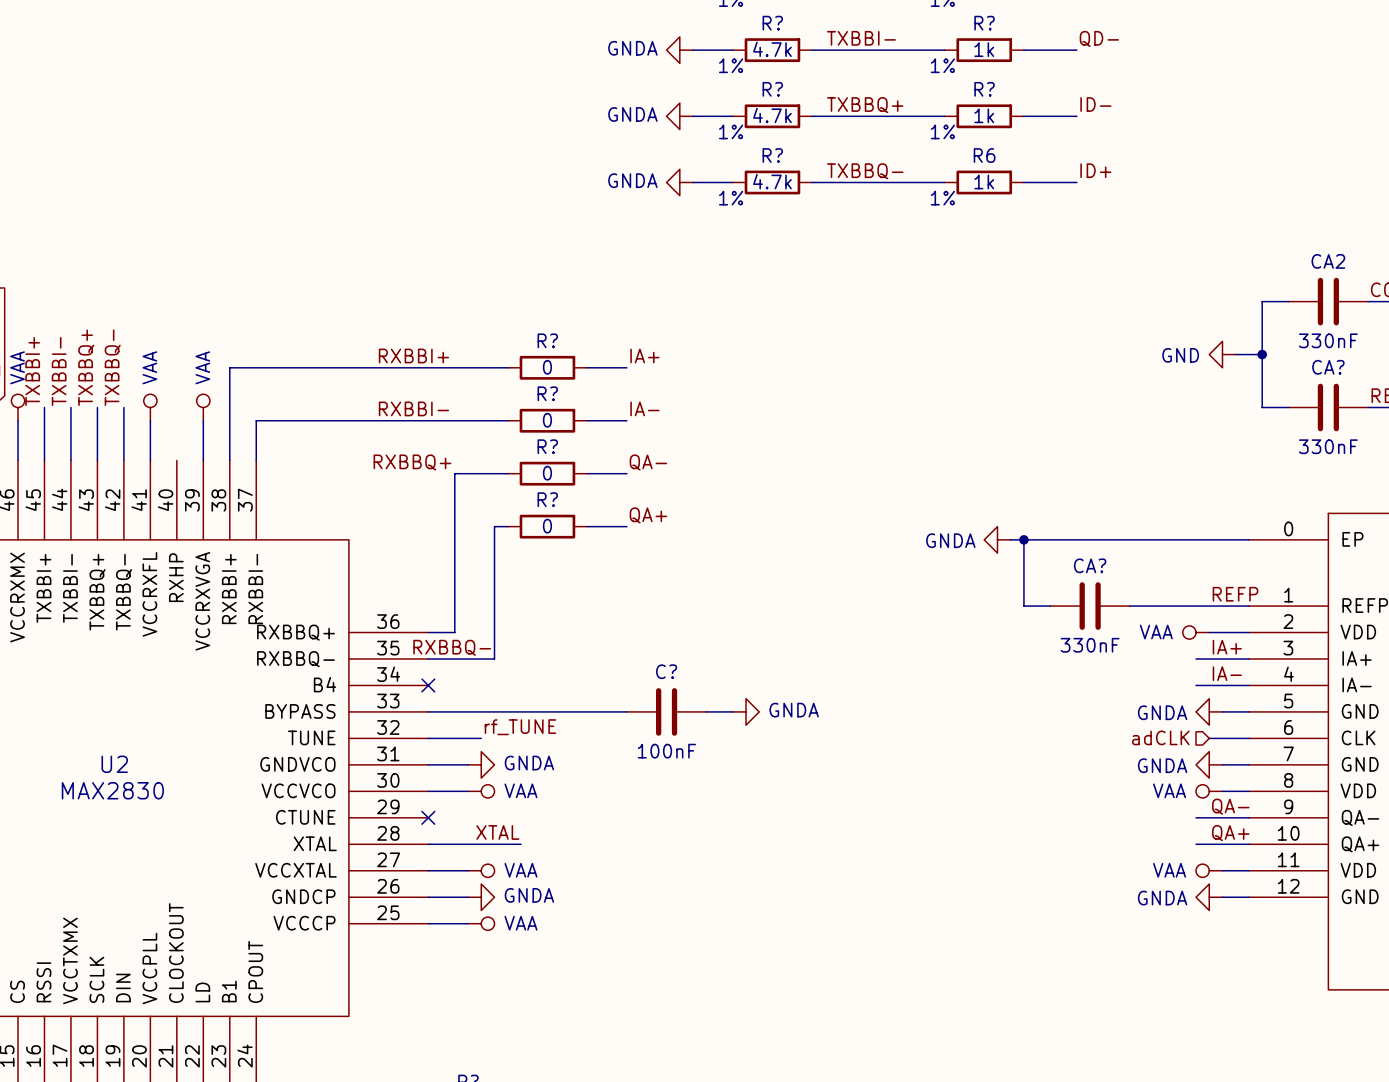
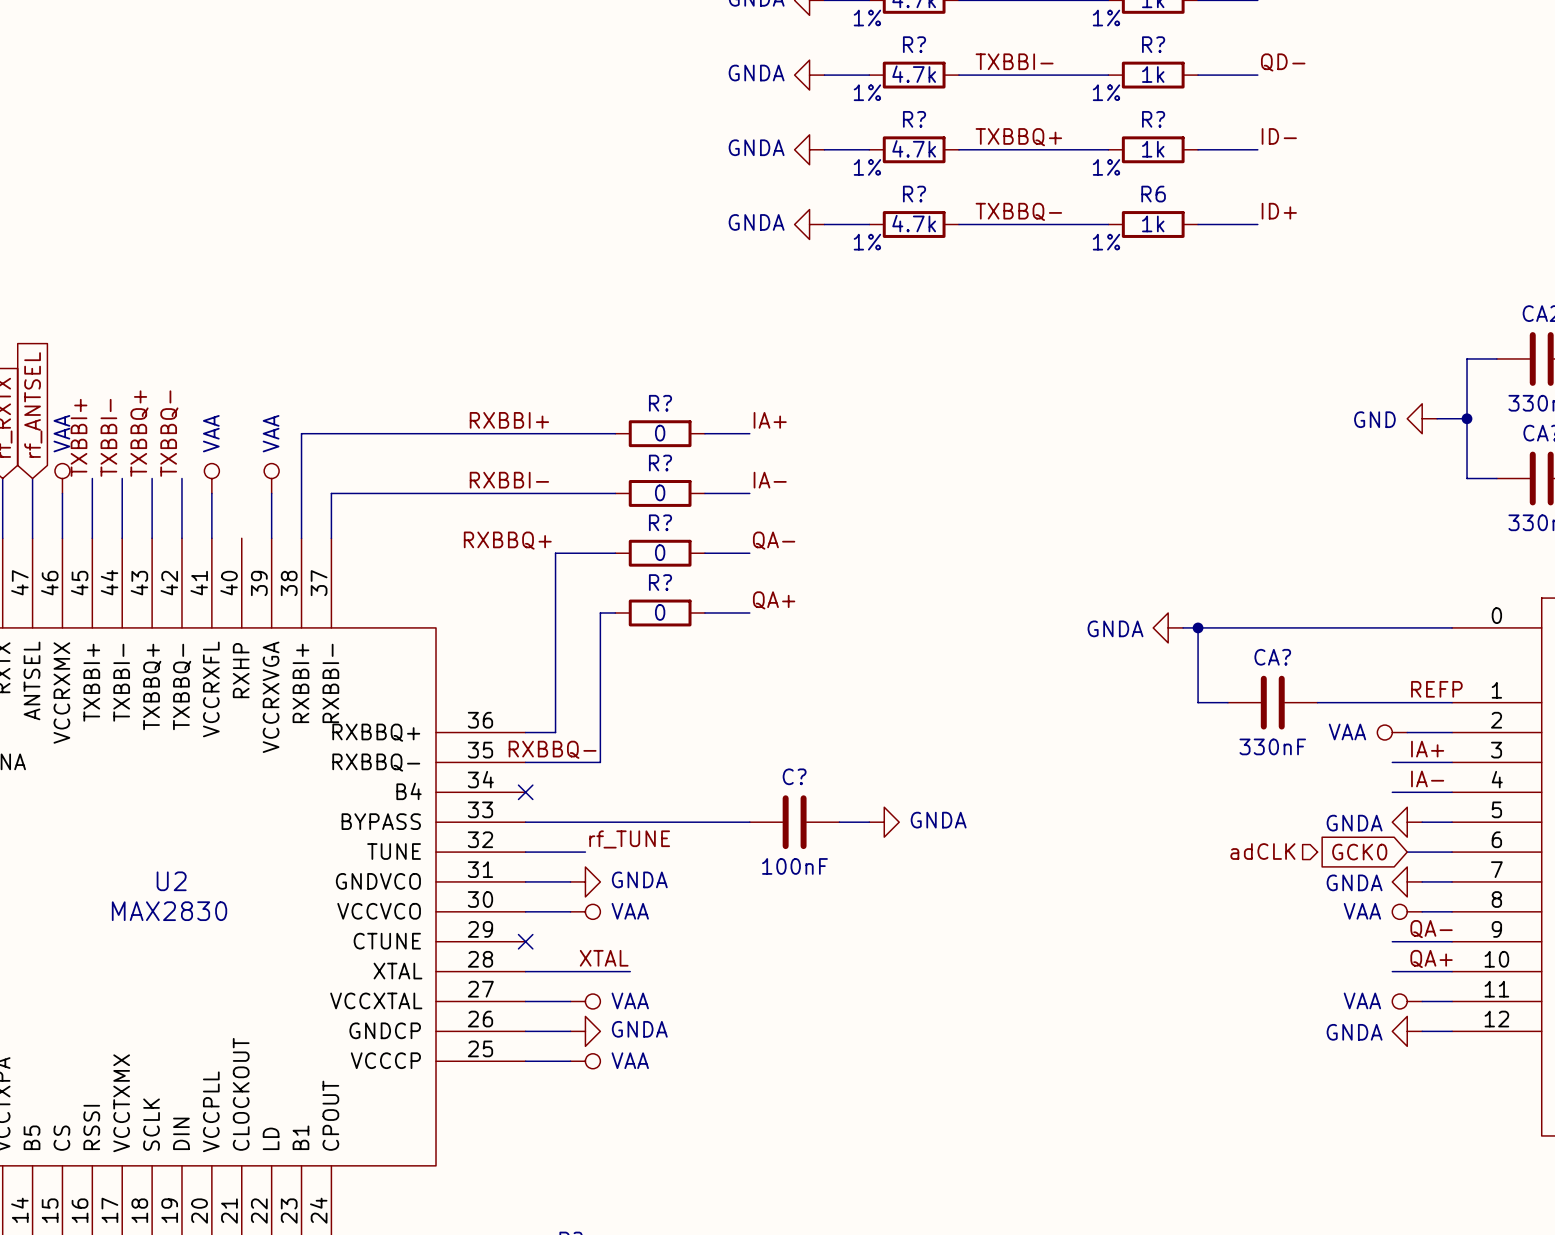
hierarchical label position: adCLK (1160, 737) -> adCLK (1262, 851)
global label: none -> GCK0 (1359, 852)

